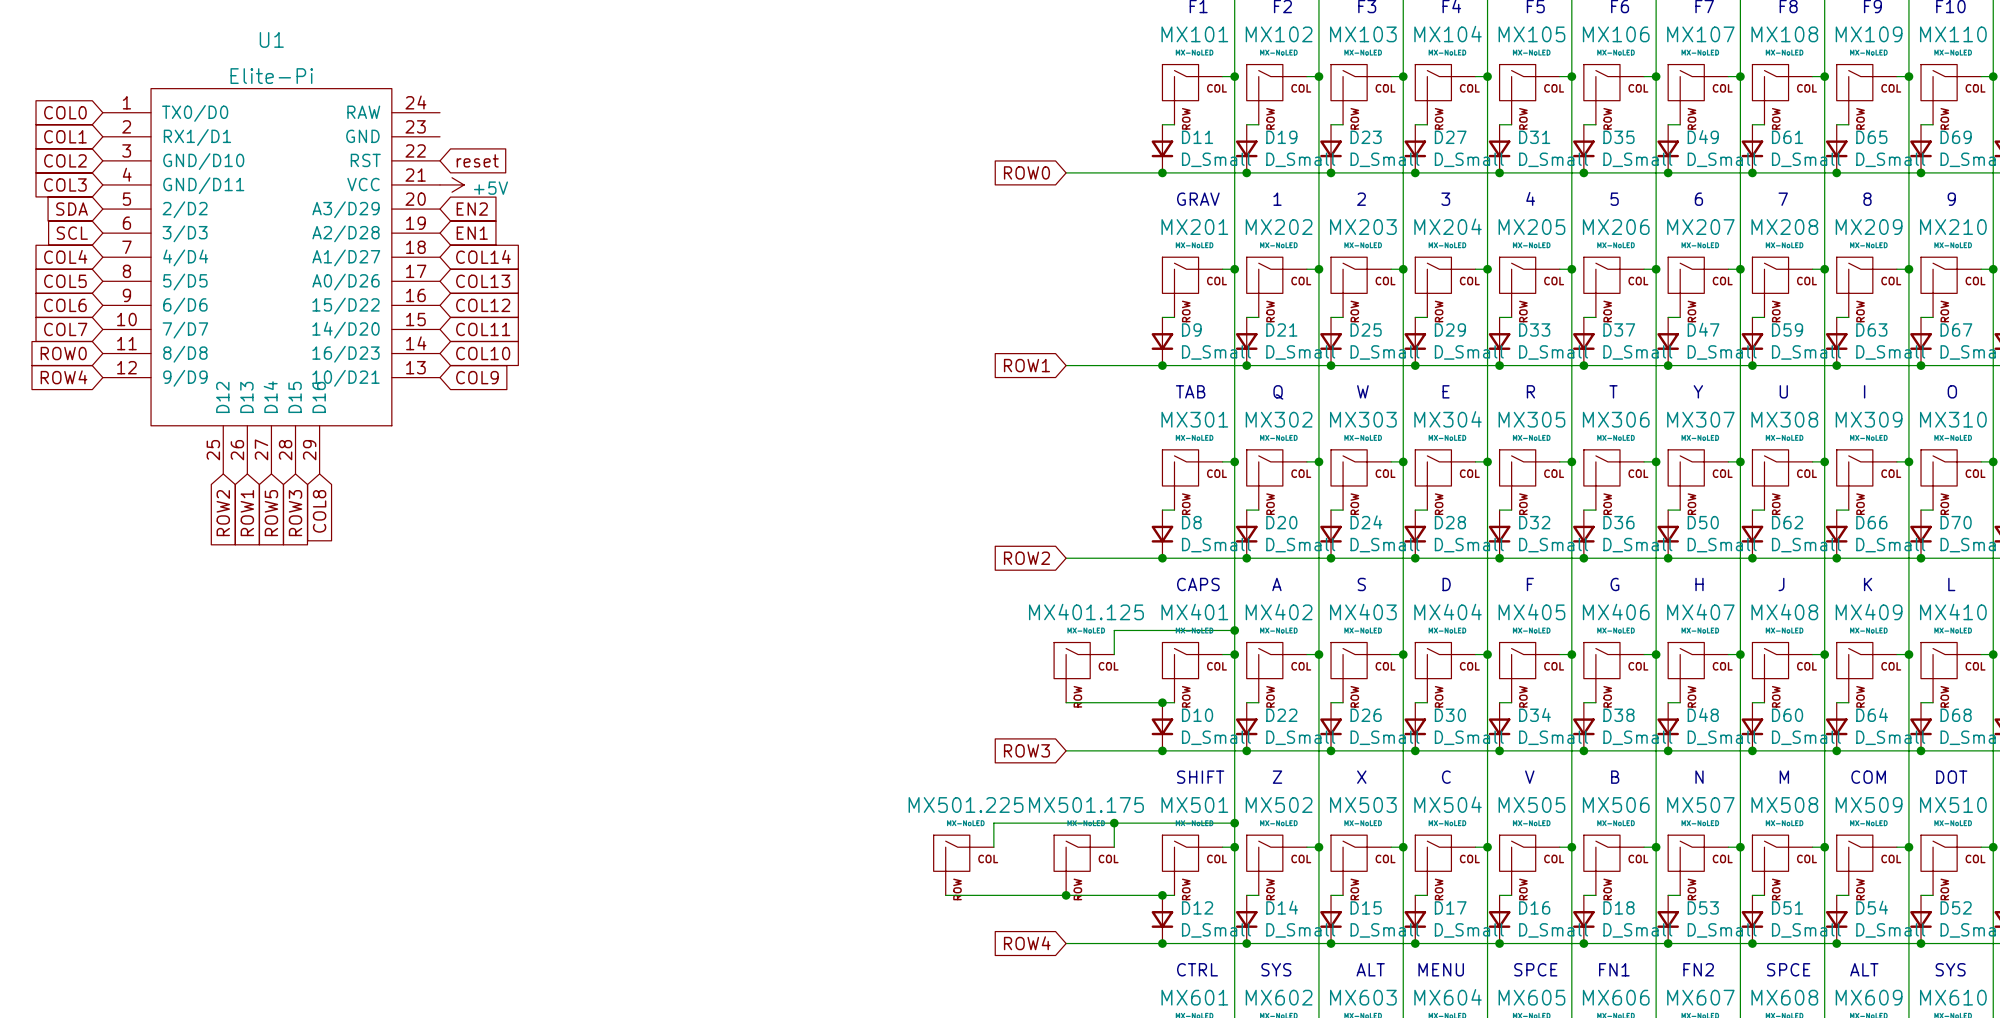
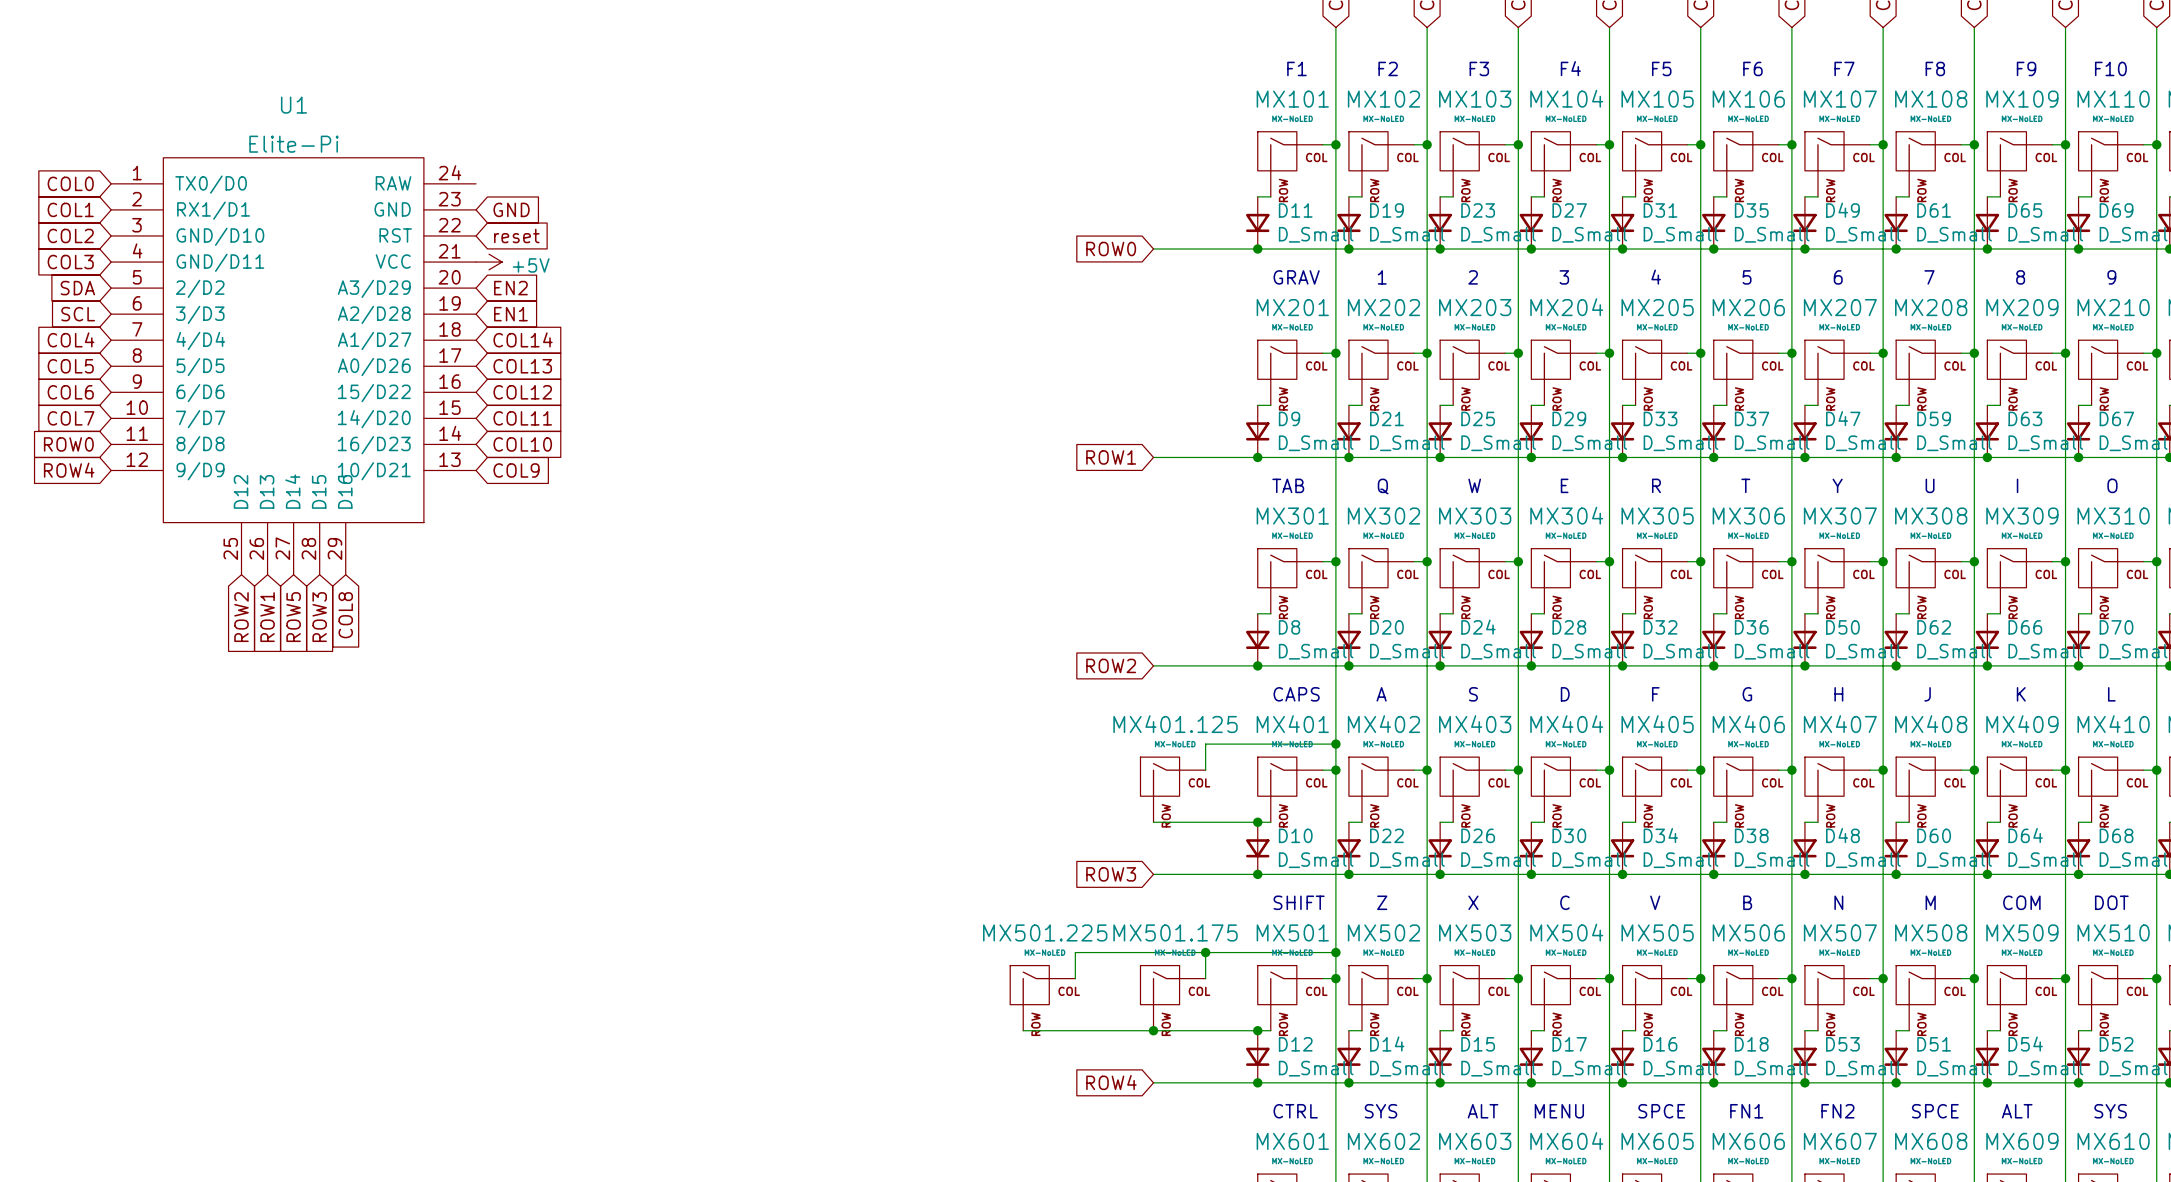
global label: none -> GND (511, 209)

